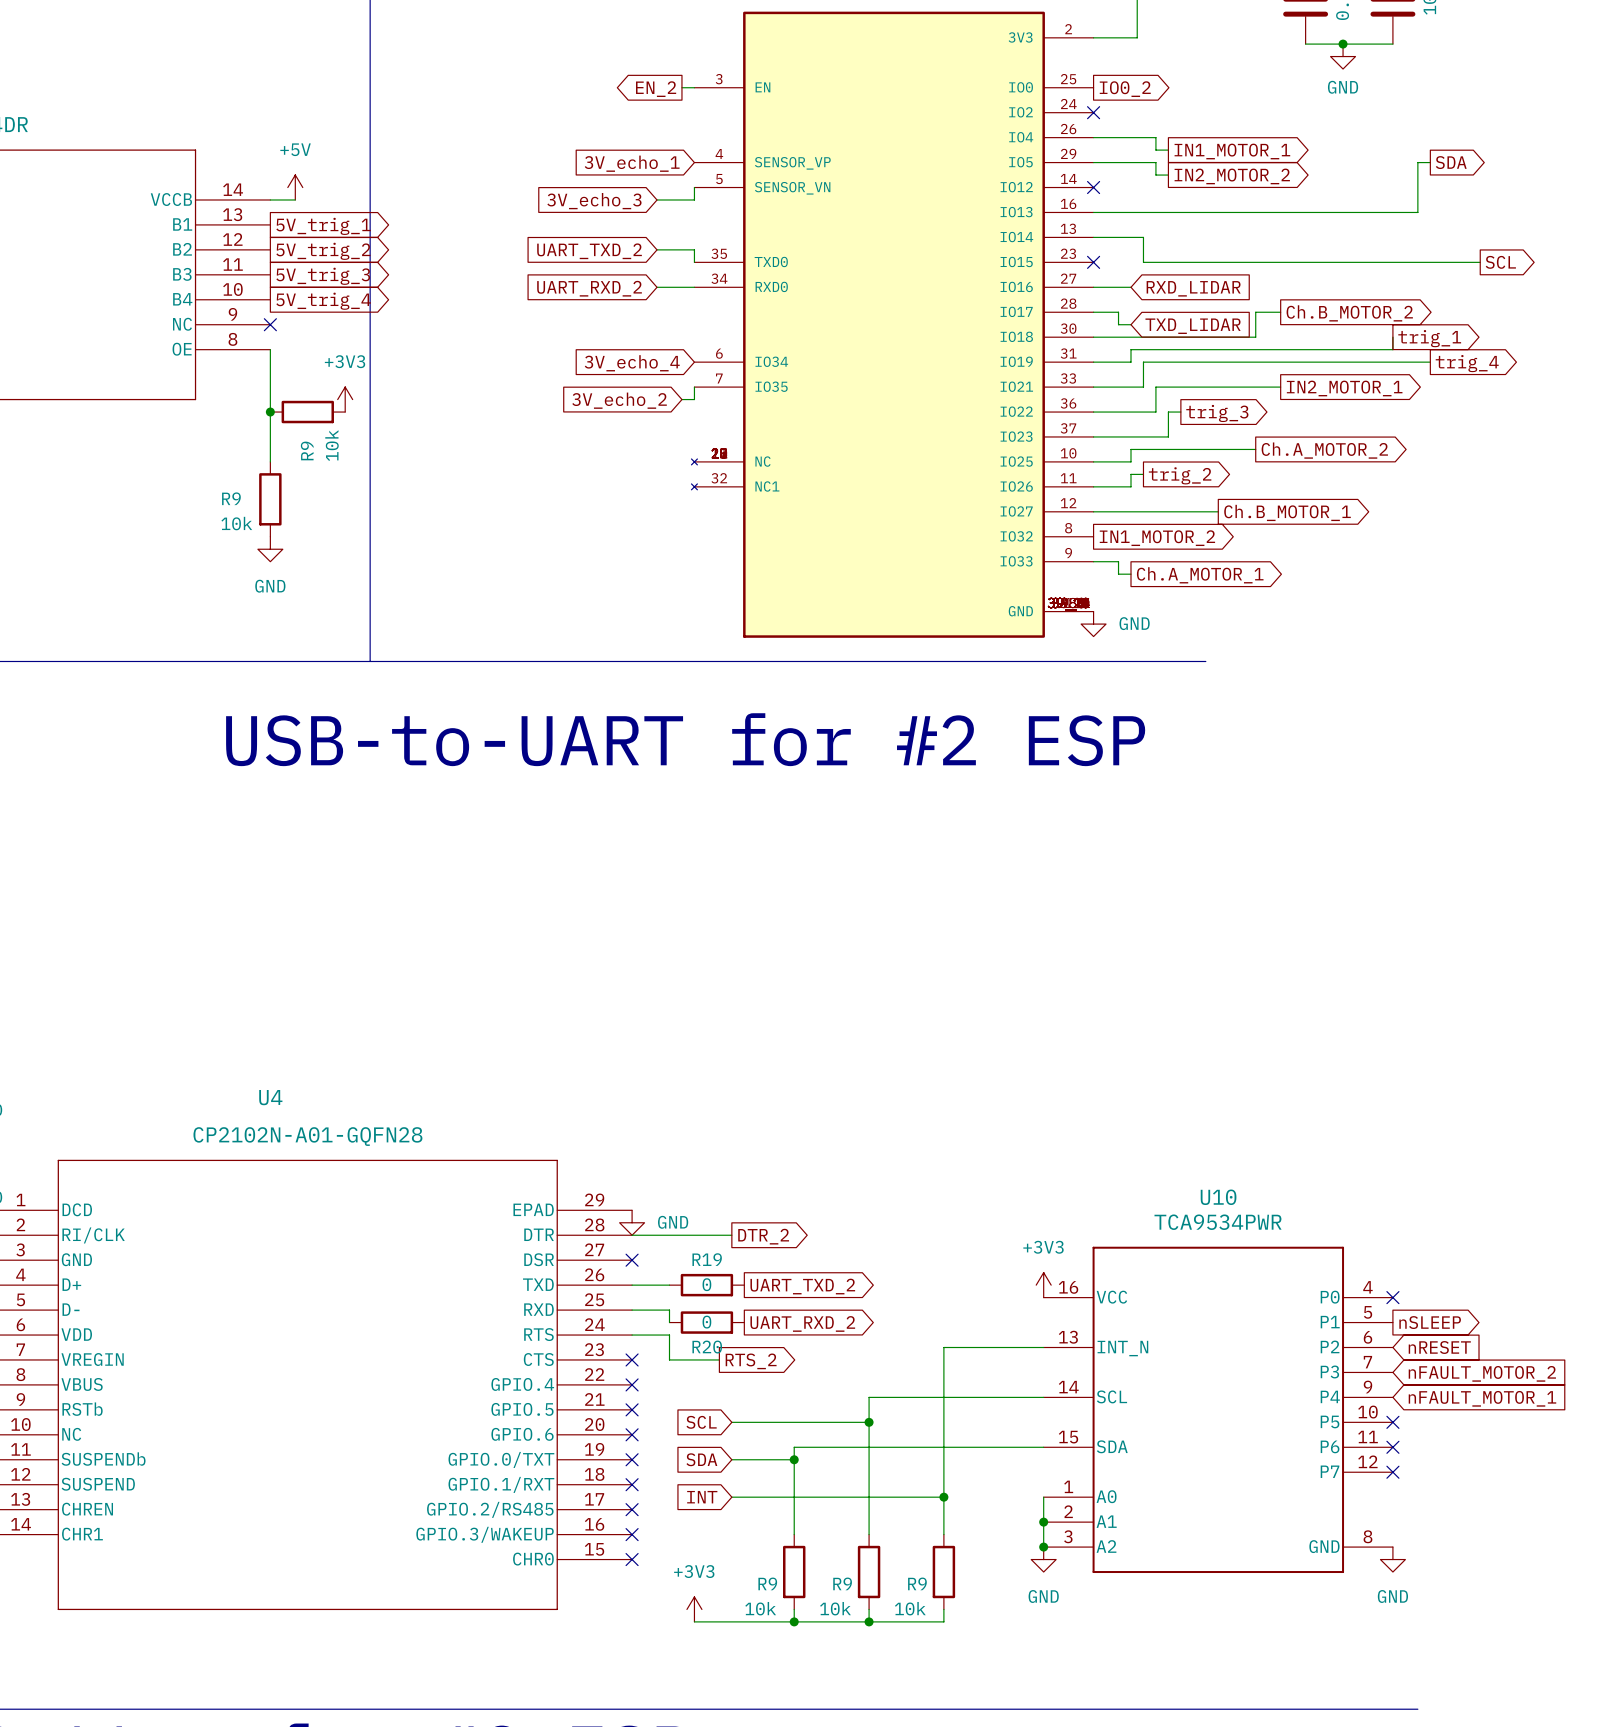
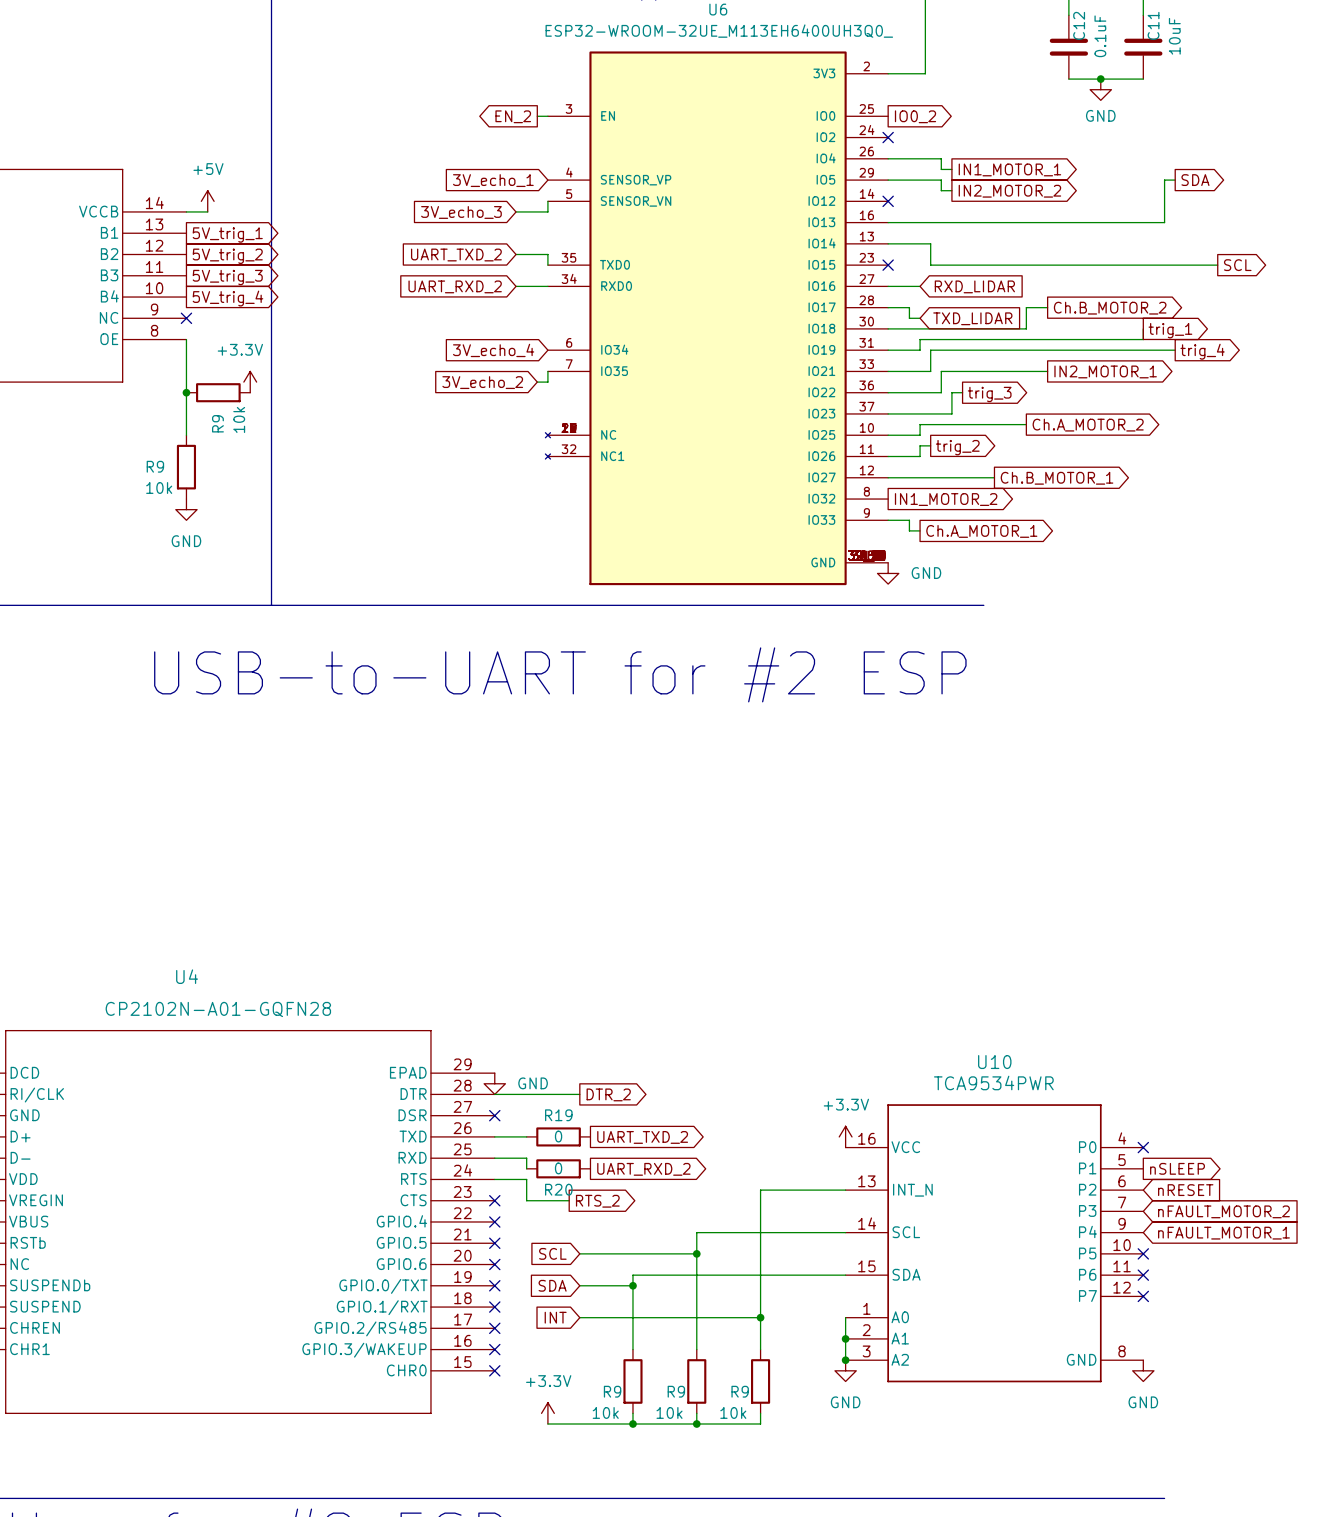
power symbol: +3V3 (345, 399) -> +3.3V (250, 382)
power symbol: +3V3 (1043, 1285) -> +3.3V (845, 1136)
power symbol: +3V3 (694, 1609) -> +3.3V (547, 1413)

